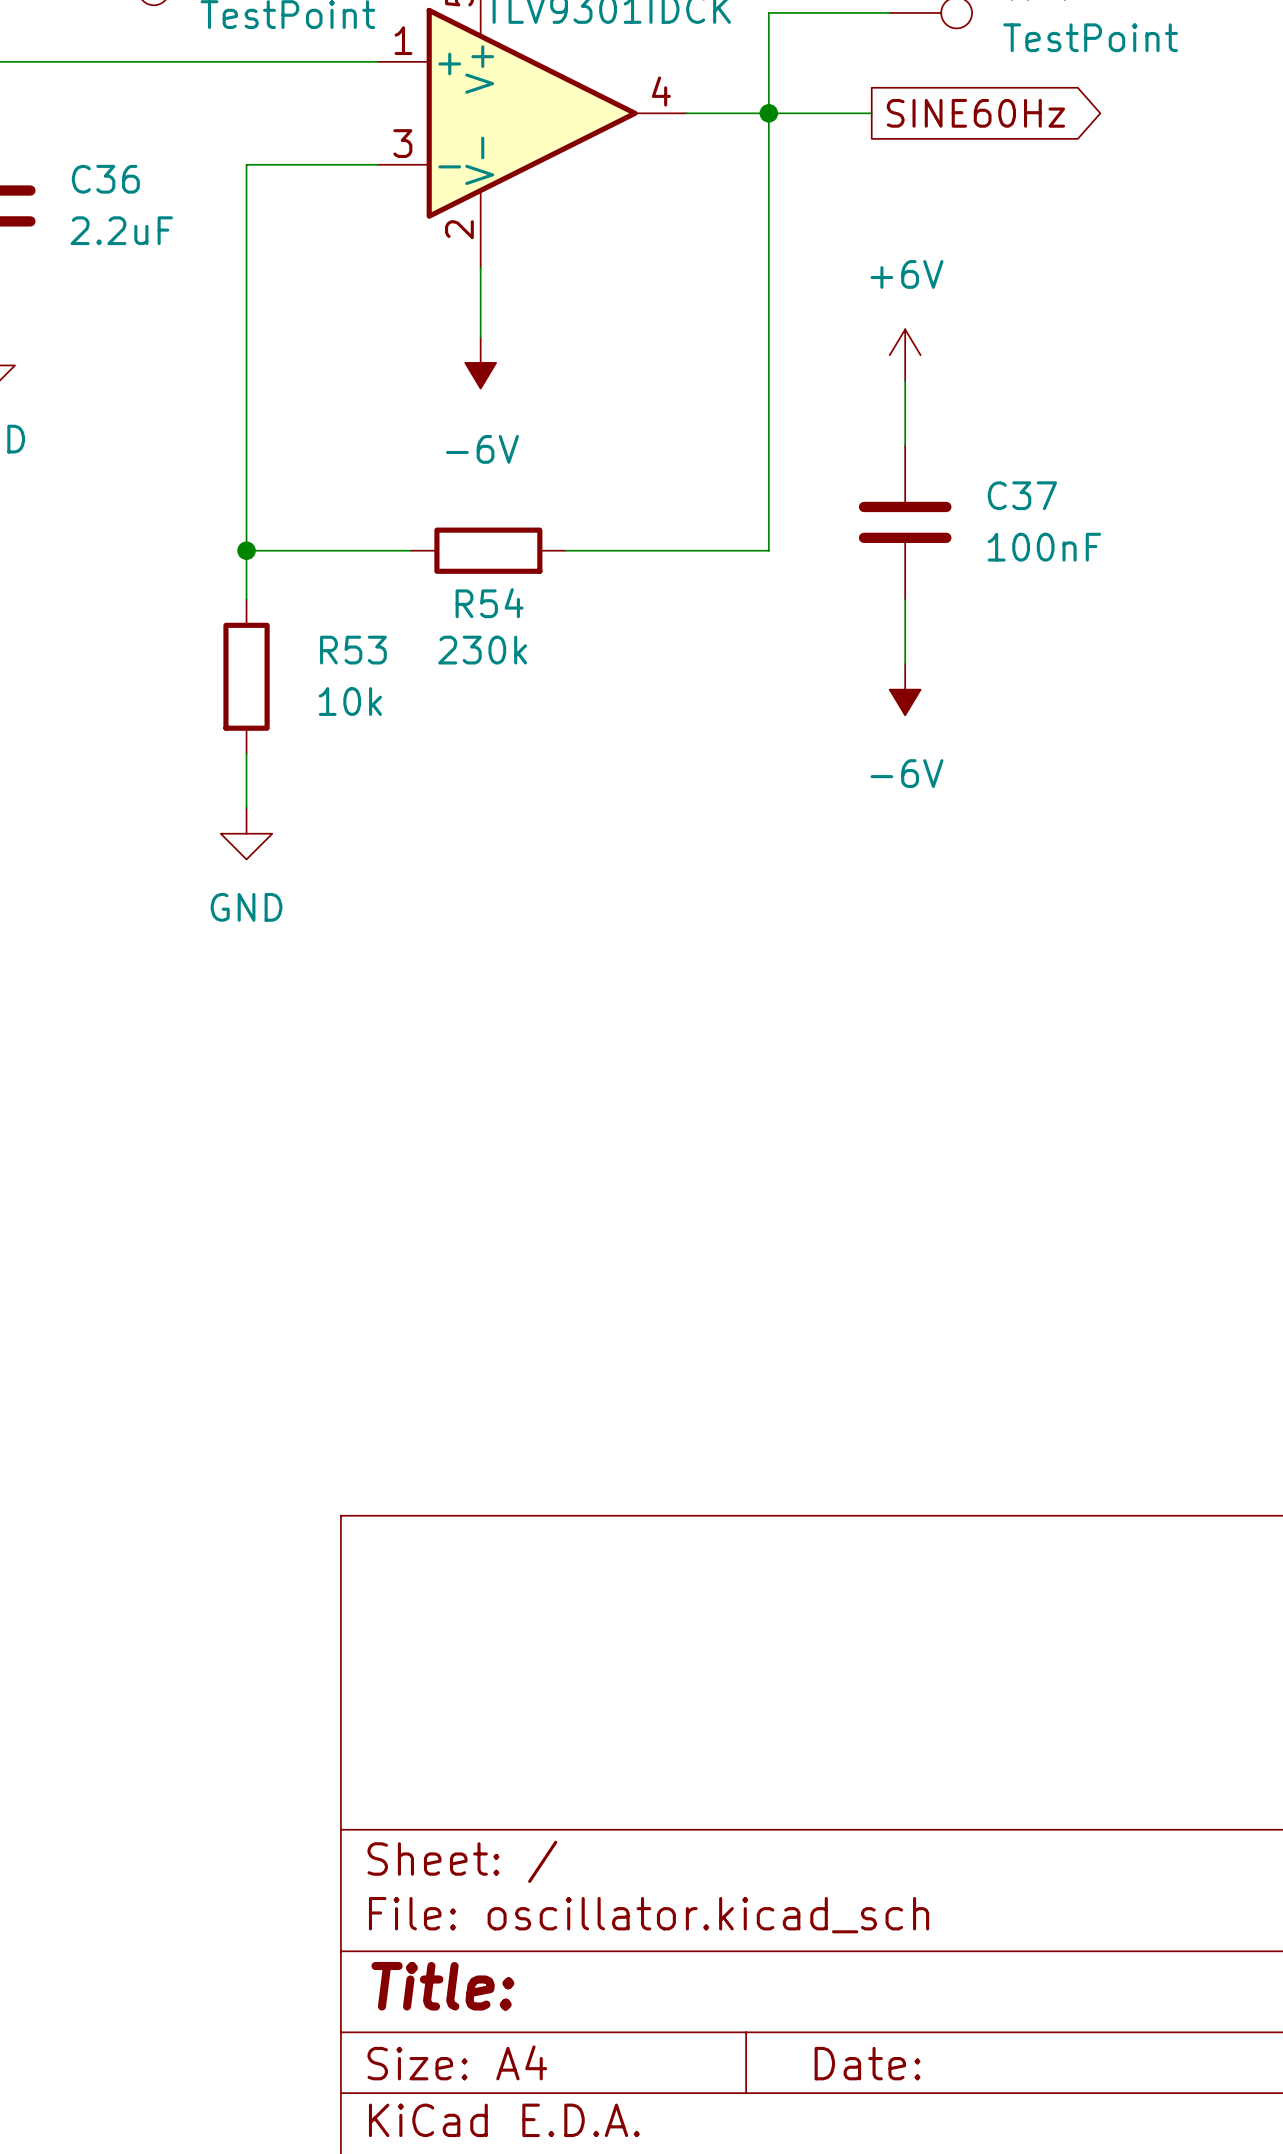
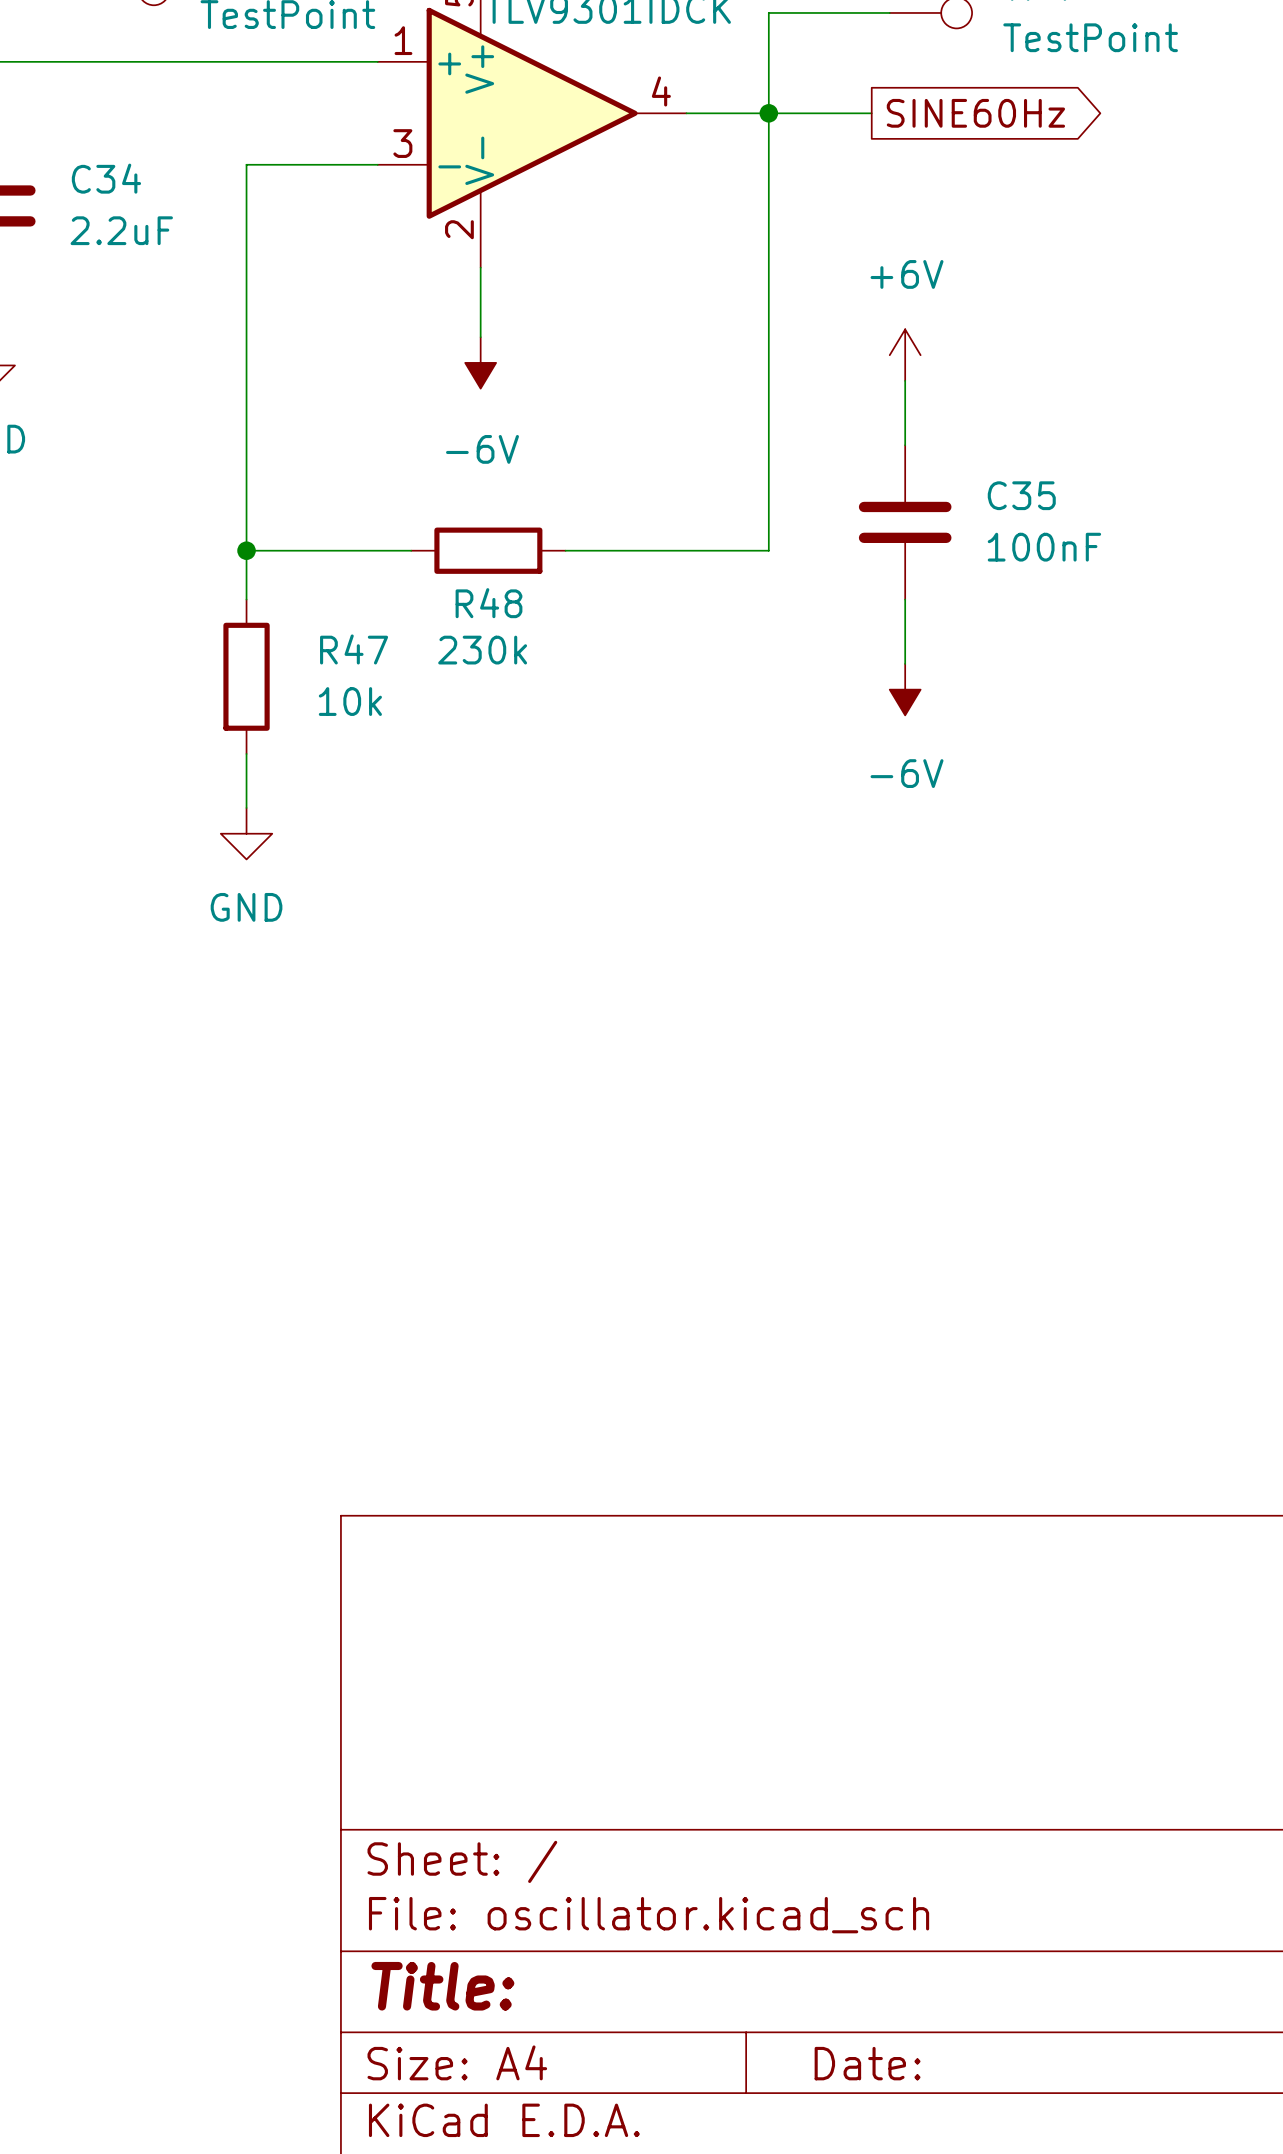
C36 name: C36 (105, 179) -> C34 (106, 178)
C37 name: C37 (1022, 495) -> C35 (1021, 495)
R54 name: R54 (489, 603) -> R48 (488, 603)
R53 name: R53 (353, 650) -> R47 (354, 649)

